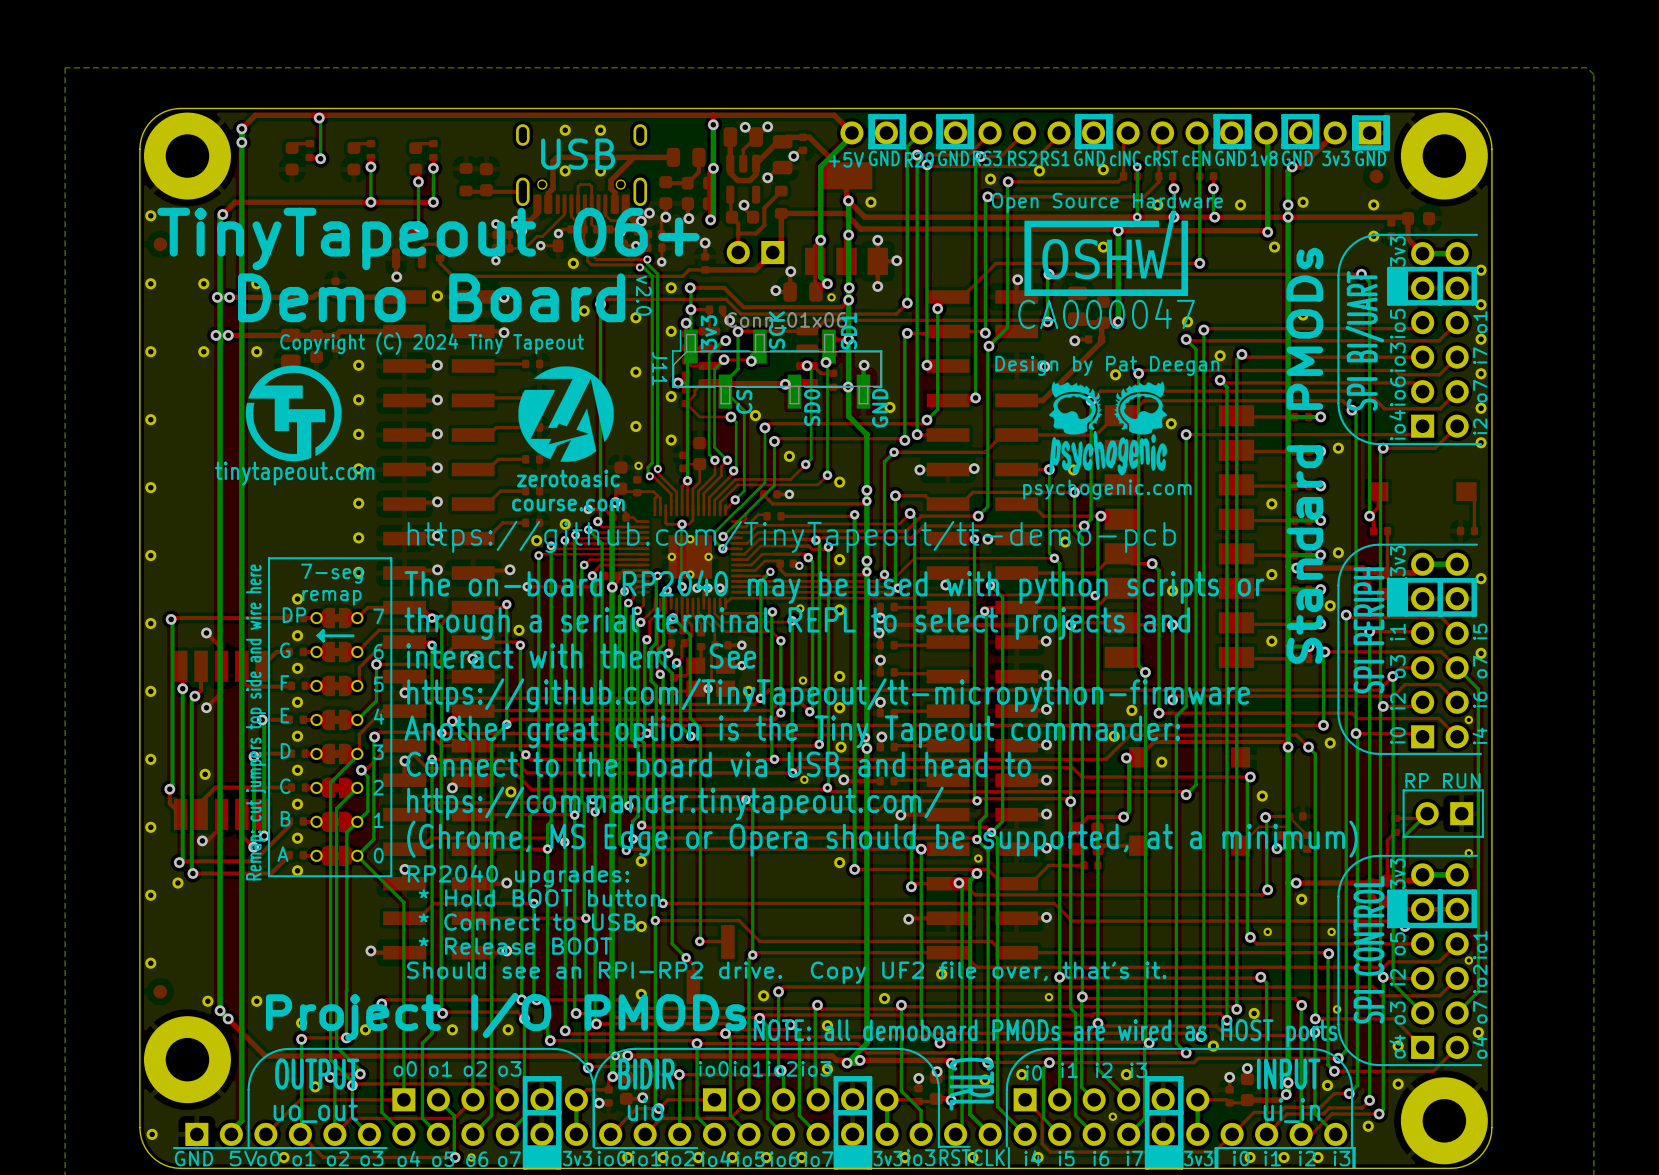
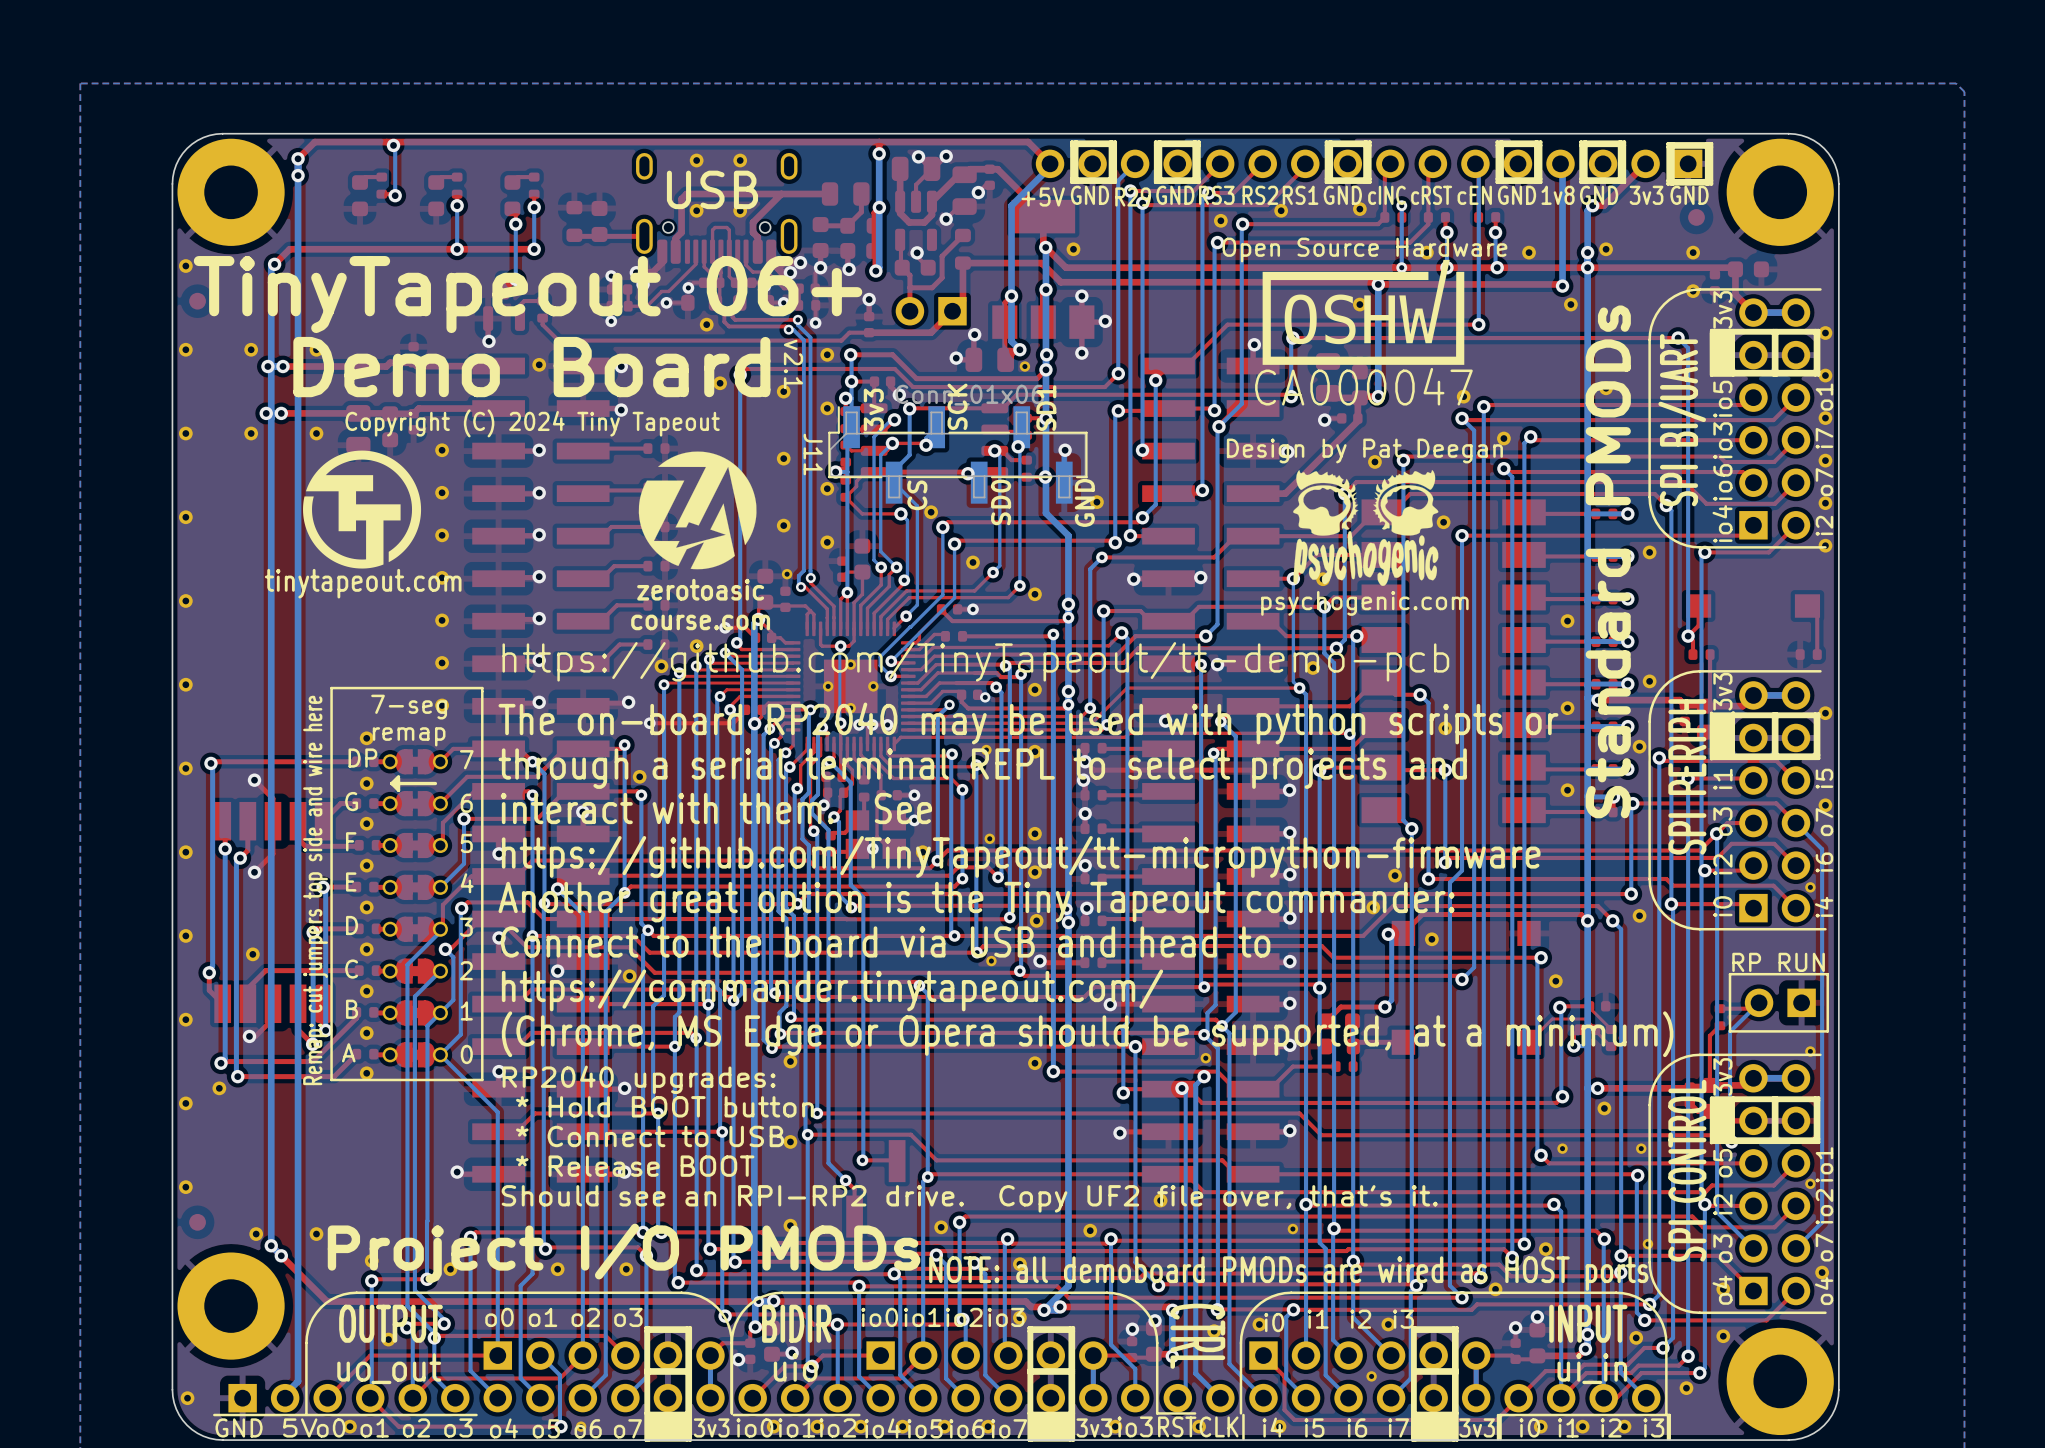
text: v2.0 (643, 295) -> v2.1 (793, 364)

